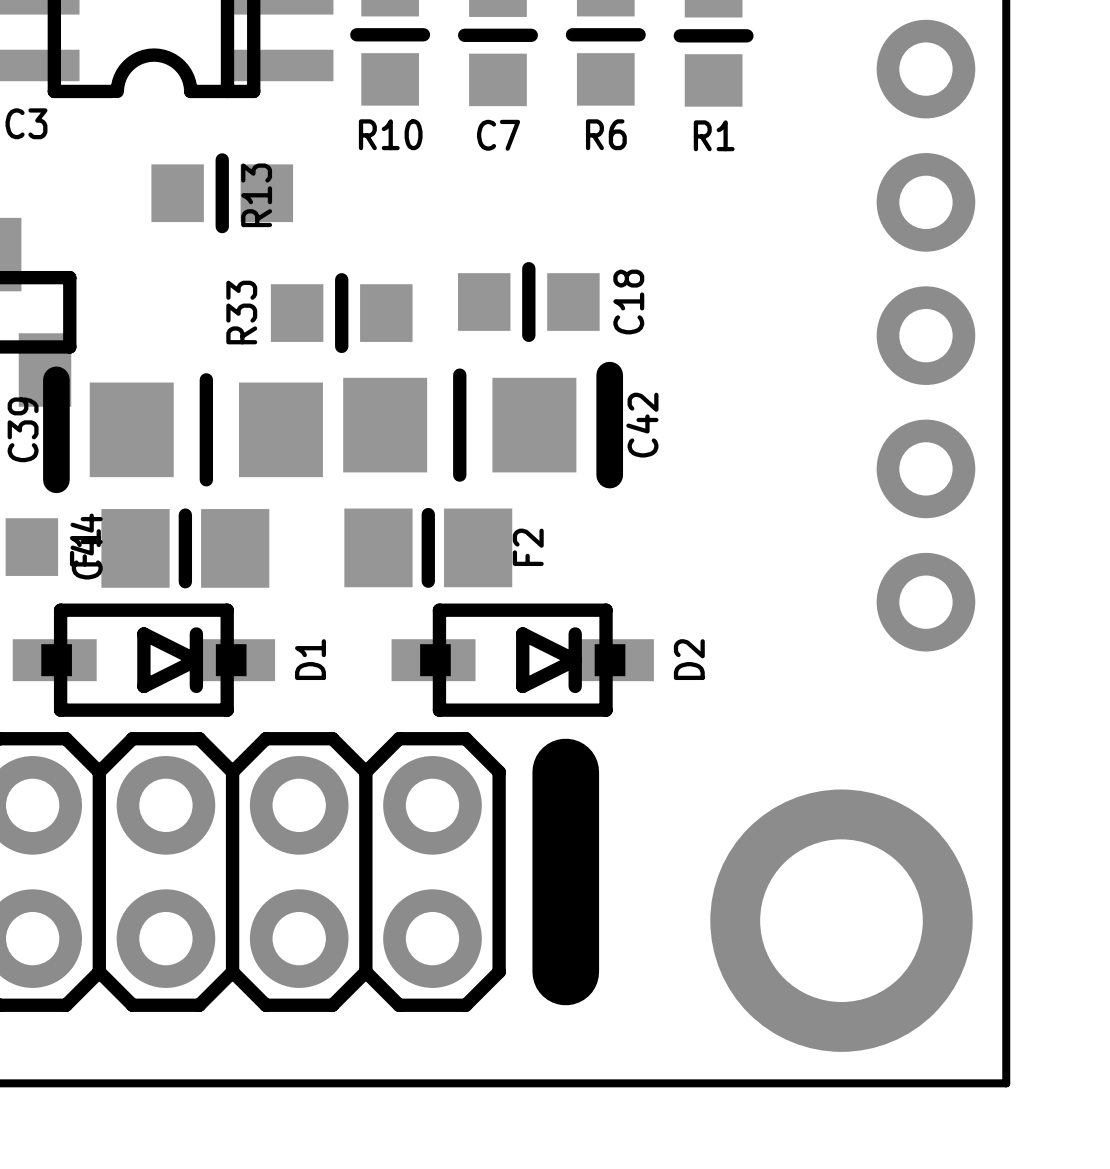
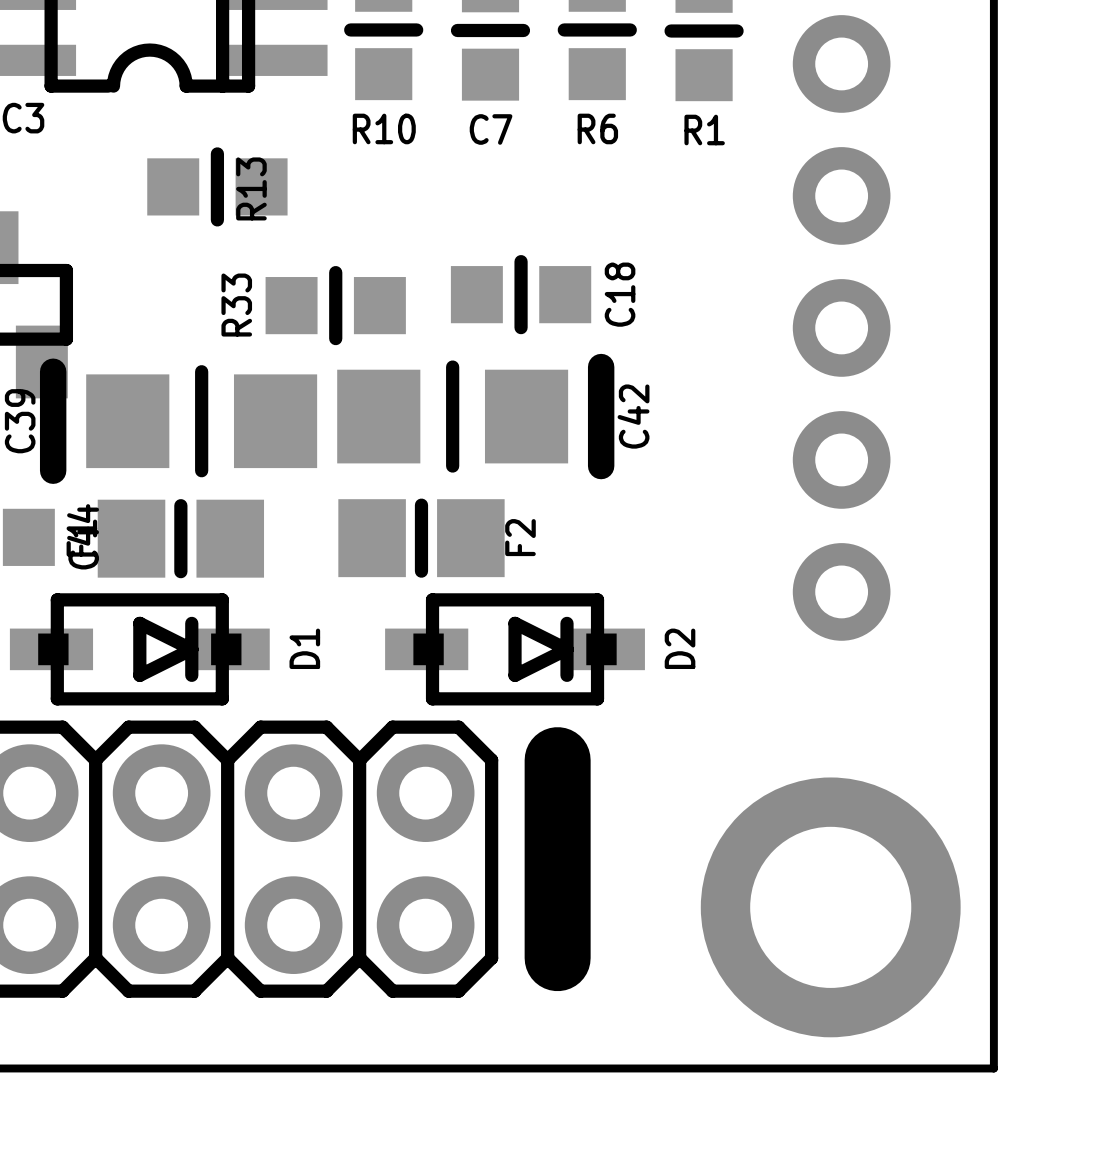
part position: (925, 69) -> (841, 63)
part position: (925, 202) -> (841, 195)
part position: (925, 335) -> (841, 327)
part position: (925, 468) -> (841, 459)
part position: (925, 602) -> (841, 591)

